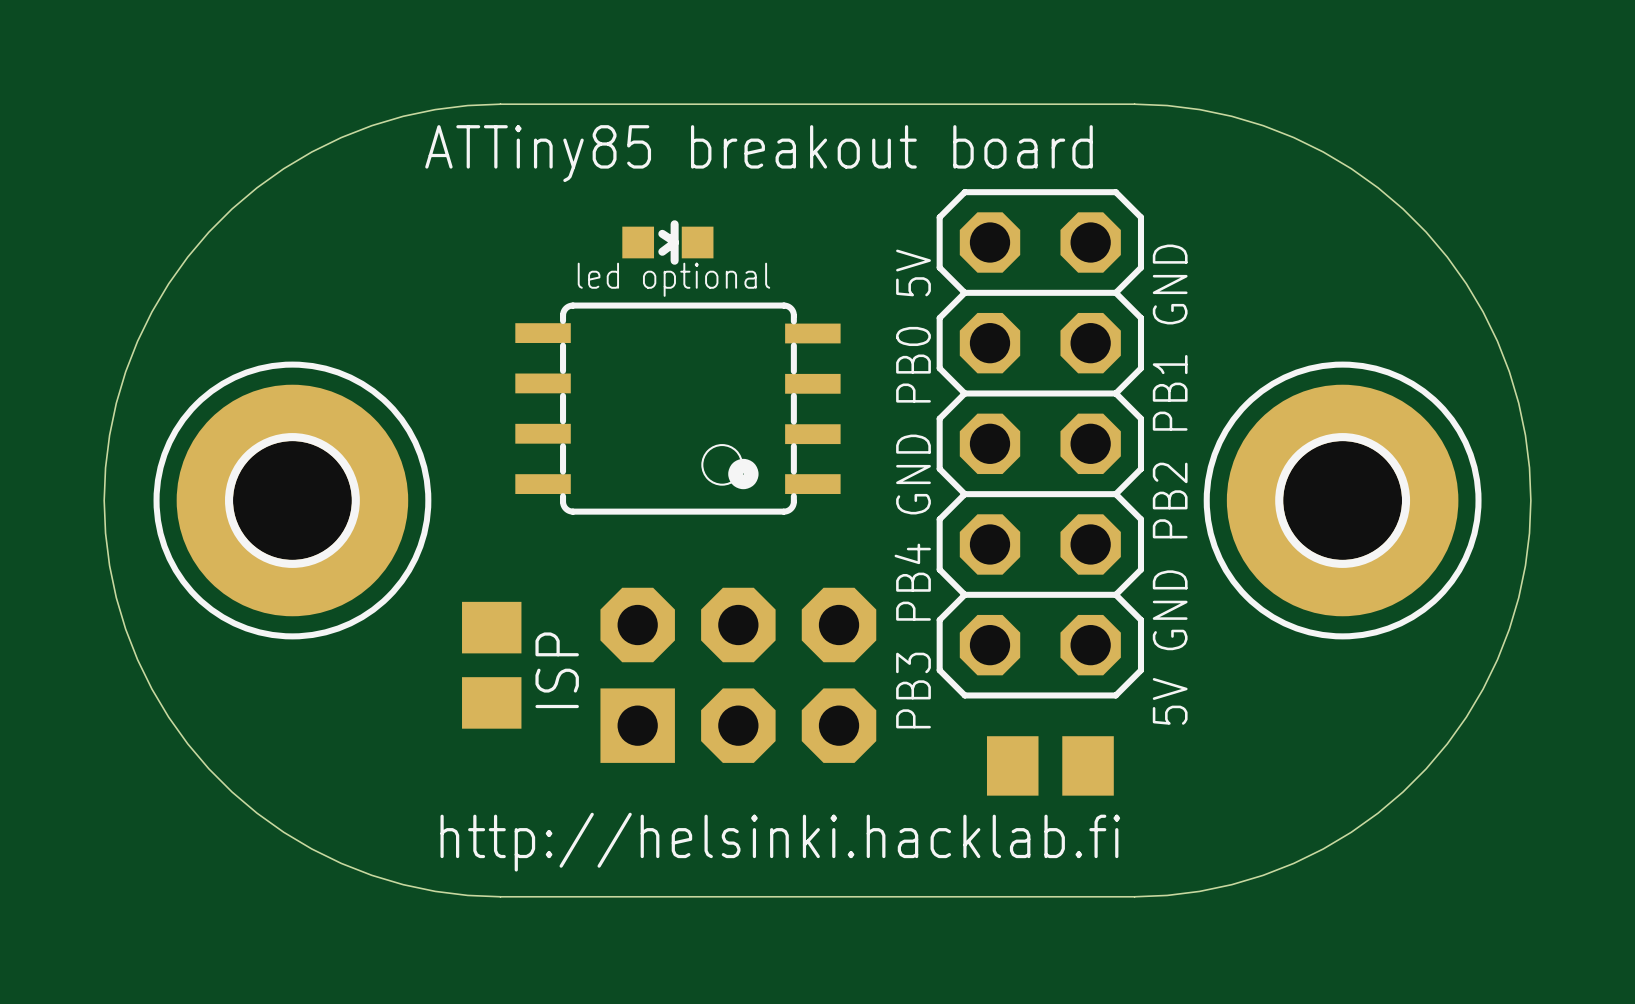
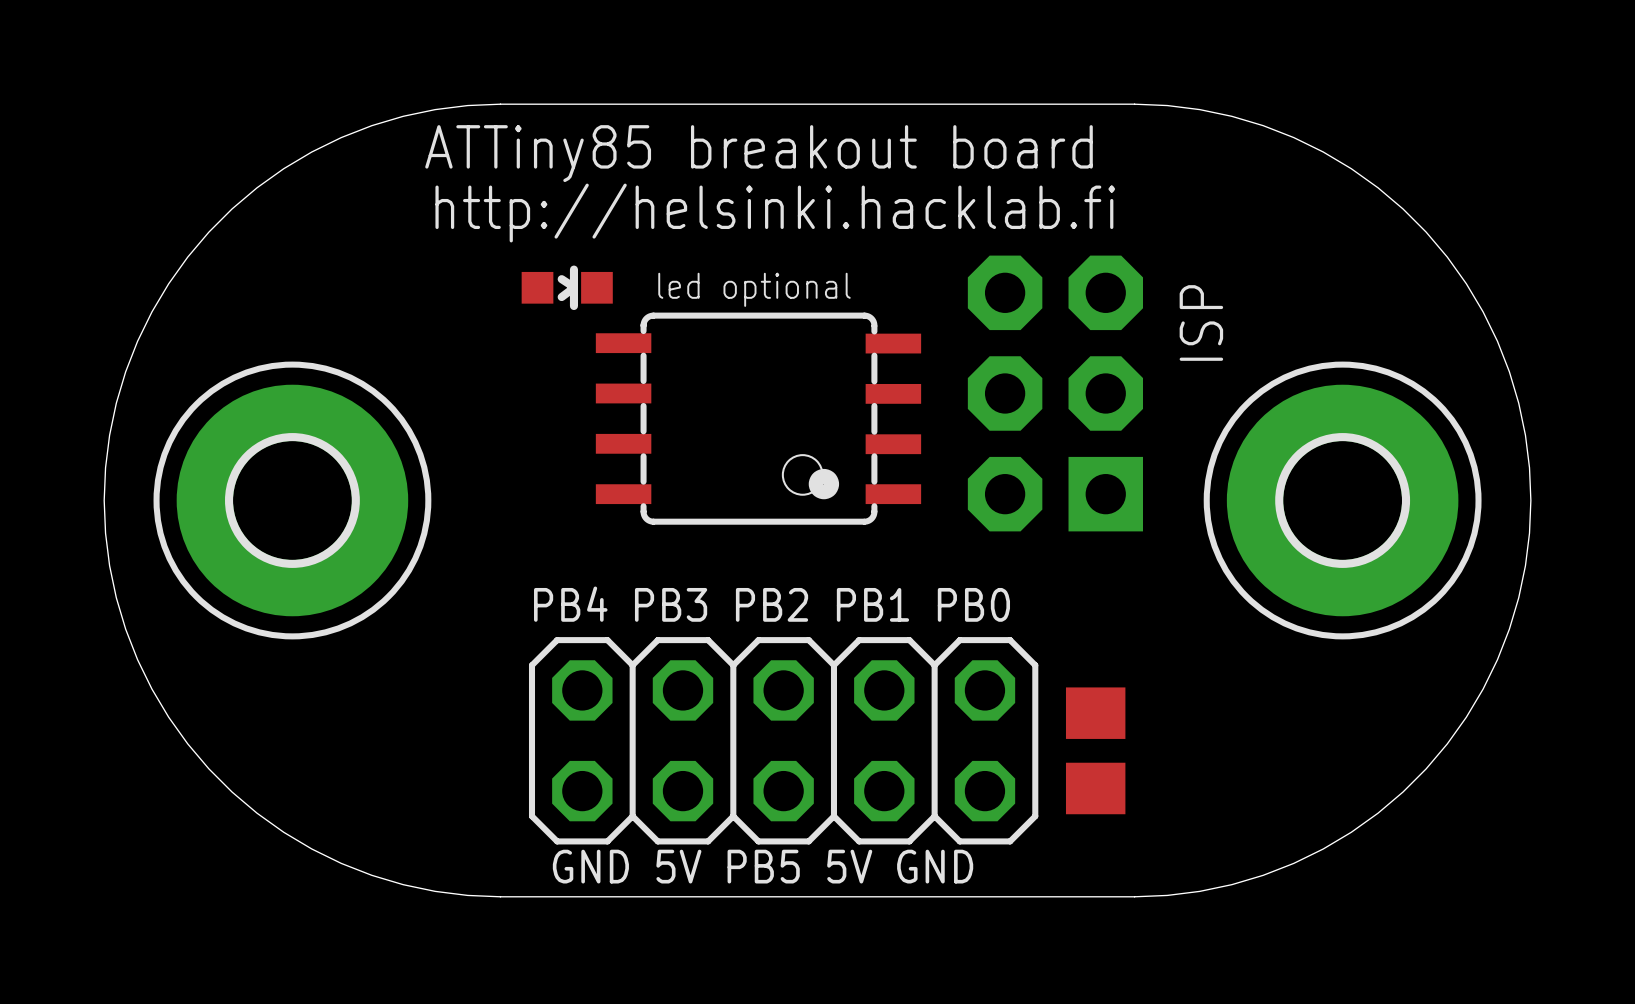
part position: (667, 242) -> (567, 287)
text position: led optional (673, 279) -> led optional (754, 289)
part position: (677, 408) -> (758, 418)
part rotation: 0° (1040, 443) -> 90° clockwise (783, 740)
part position: (1040, 443) -> (783, 740)
drawing position: (743, 474) -> (823, 484)
text: 5V GND PB2 PB1 GND (1170, 484) -> none
text: PB3 PB4 GND PB0 5V (912, 489) -> none
text: none -> PB4 PB3 PB2 PB1 PB0 (772, 604)
part: (491, 665) -> none
text position: ISP (557, 670) -> ISP (1201, 322)
part rotation: 0° (738, 675) -> 90° counterclockwise (1055, 393)
part position: (738, 675) -> (1055, 393)
part rotation: 0° (1050, 765) -> 90° clockwise (1095, 750)
text position: http://helsinki.hacklab.fi (780, 842) -> http://helsinki.hacklab.fi (775, 213)
text: none -> GND 5V PB5 5V GND (763, 866)

